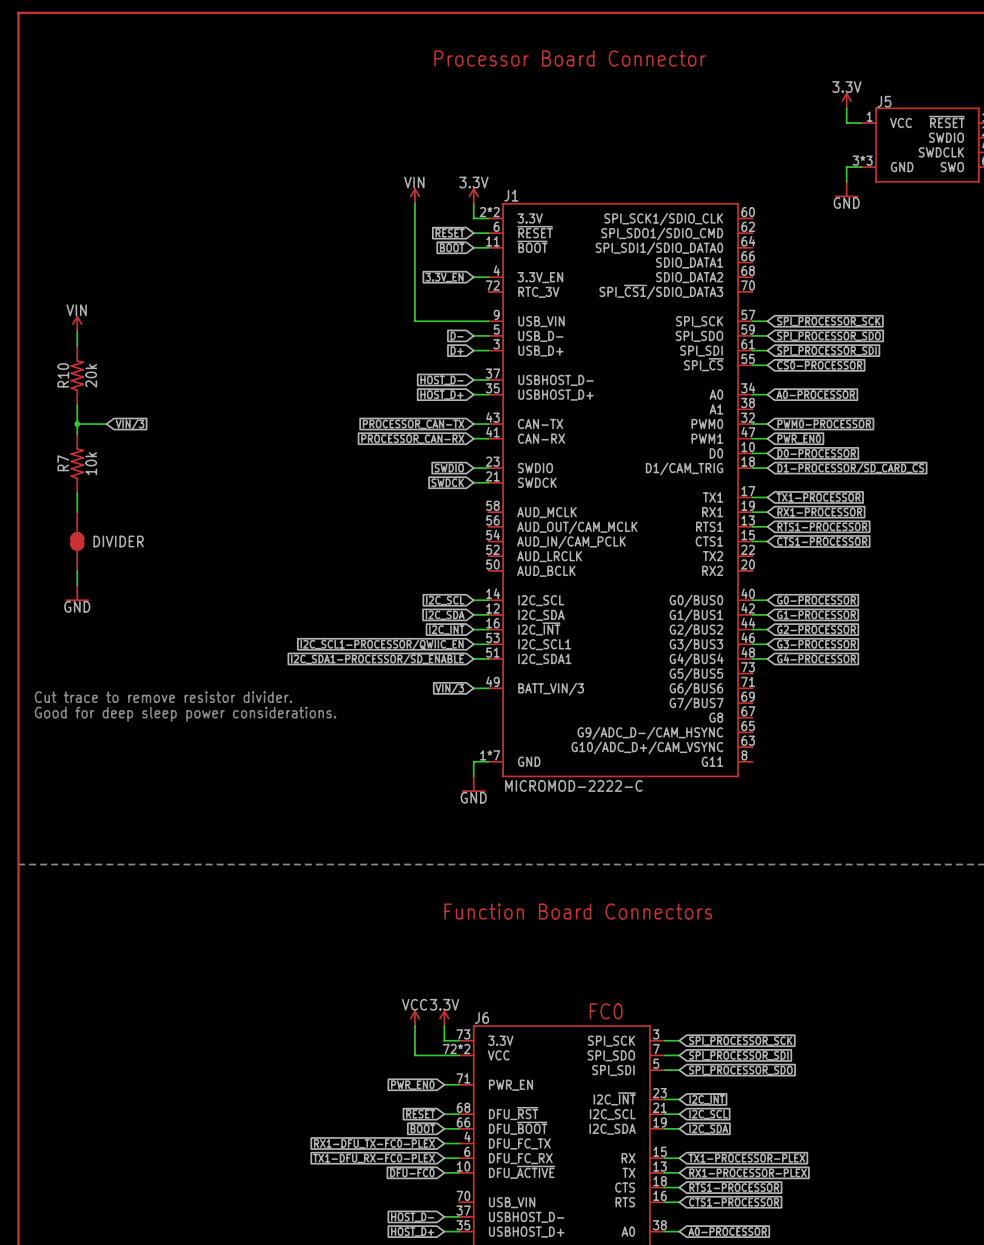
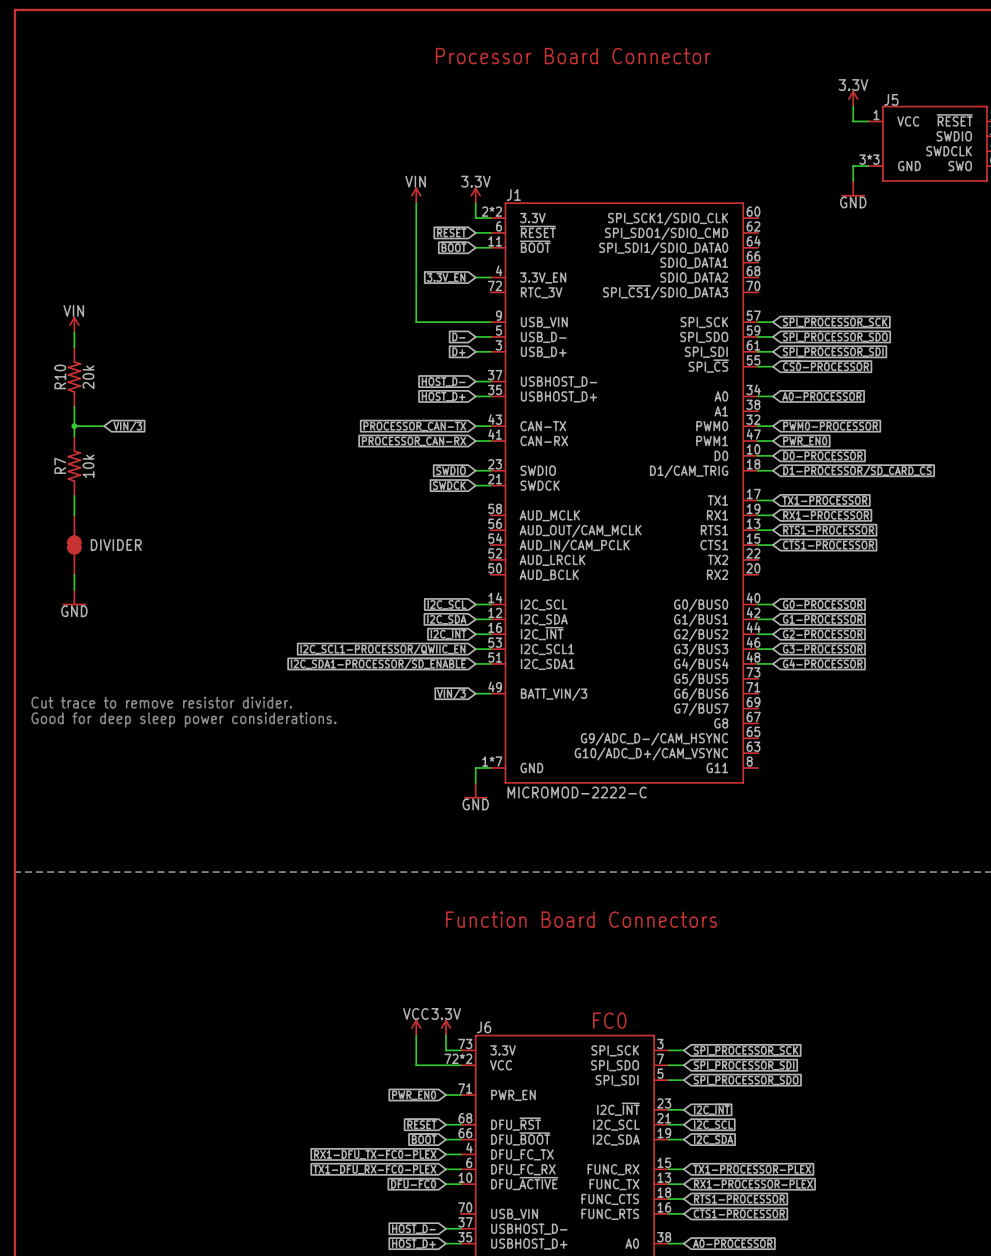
J6 pin name: RX (628, 1158) -> FUNC_RX (613, 1169)
J6 pin name: TX (628, 1172) -> FUNC_TX (614, 1184)
J6 pin name: CTS (625, 1187) -> FUNC_CTS (610, 1199)
J6 pin name: RTS (625, 1202) -> FUNC_RTS (610, 1214)

